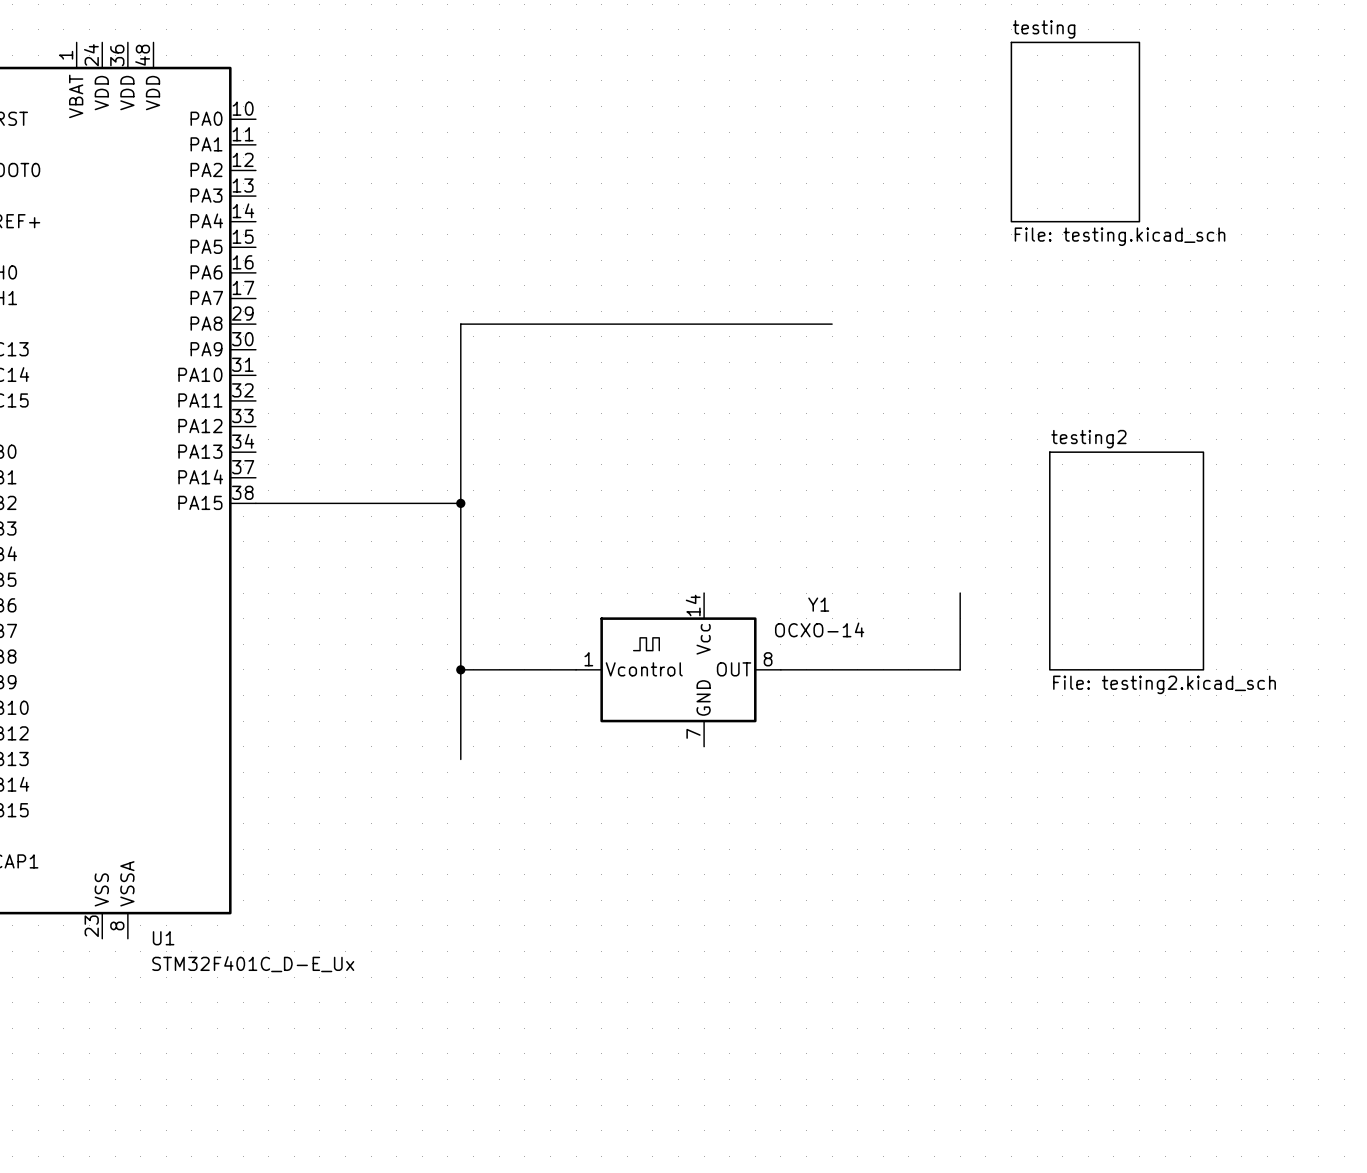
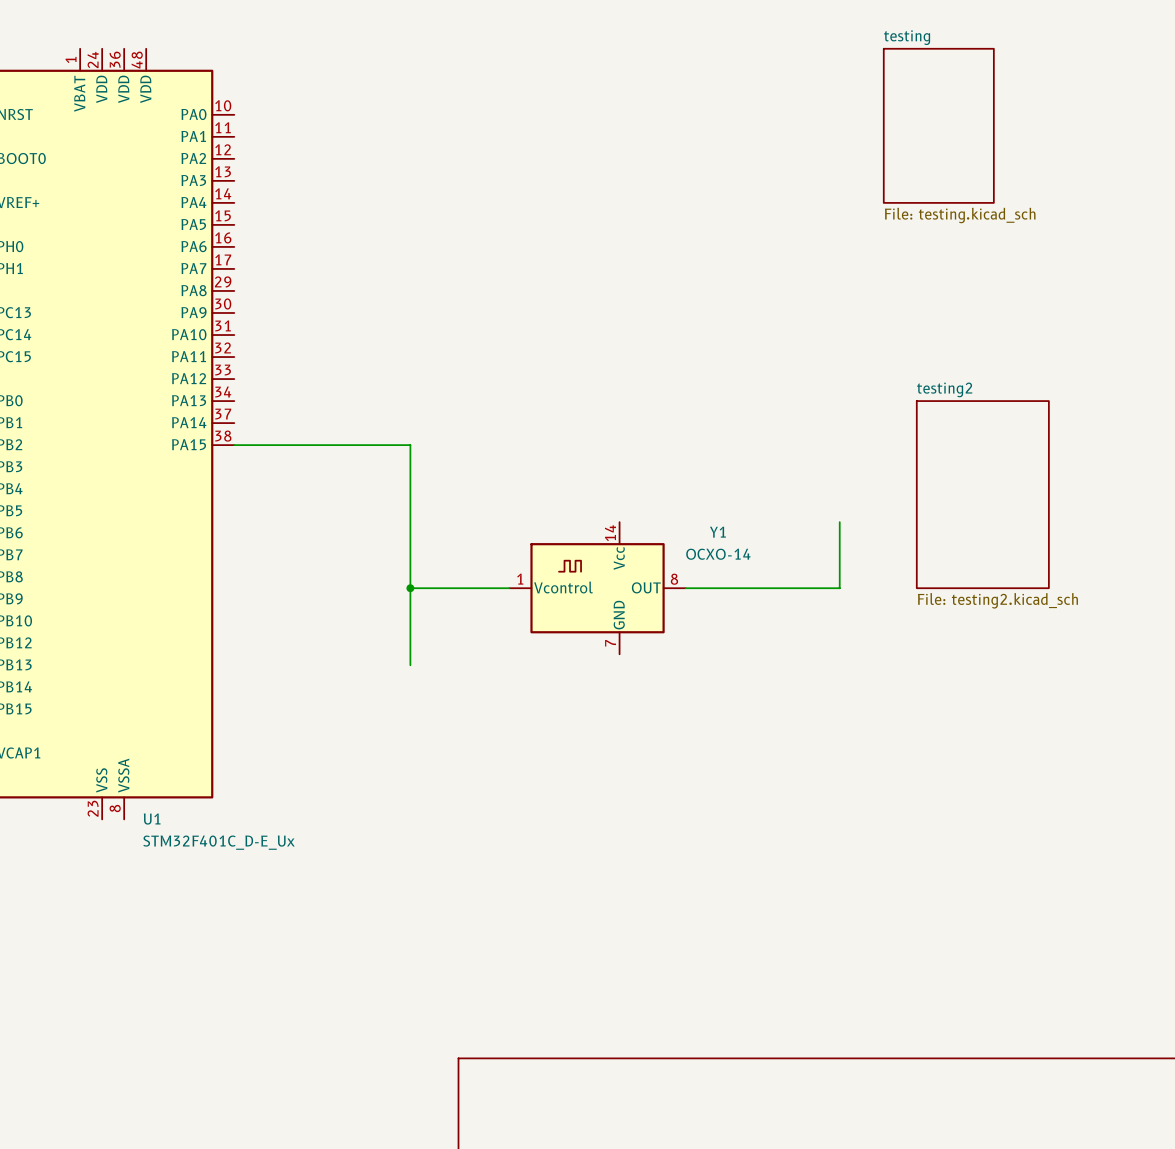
wire: (832, 324) (460, 324) (460, 503) -> none
junction: (460, 503) -> none

